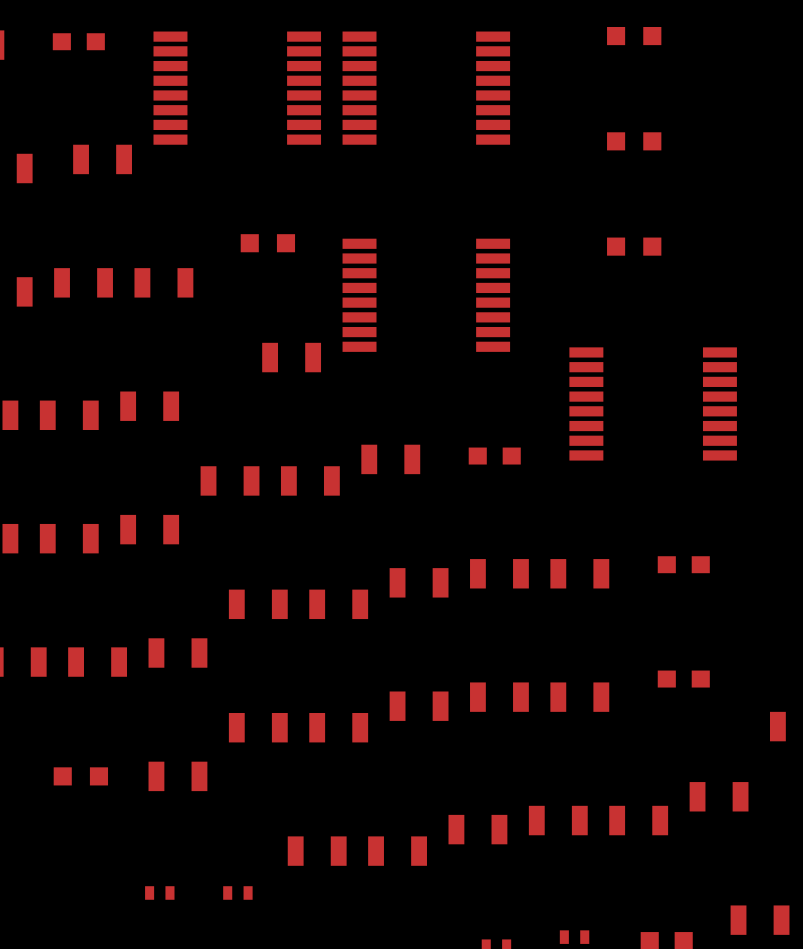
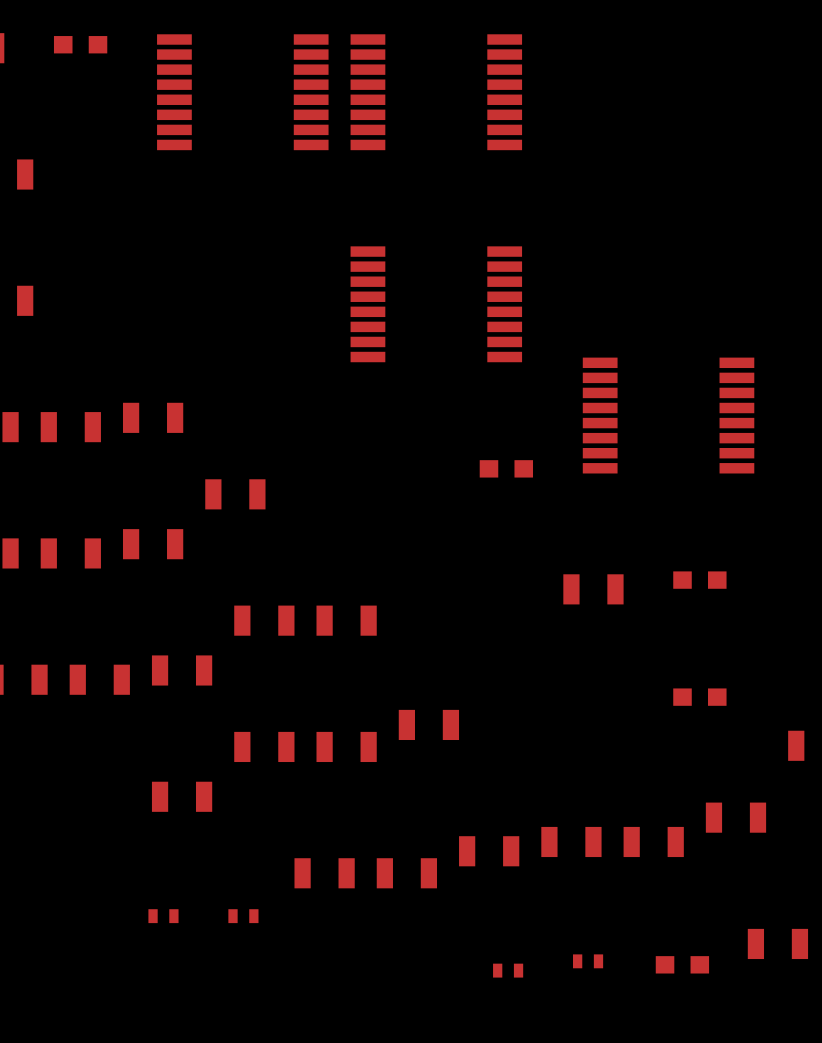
part: (634, 36) -> none
part: (634, 141) -> none
part: (102, 159) -> none
part: (267, 243) -> none
part: (634, 246) -> none
part: (83, 282) -> none
part: (163, 282) -> none
part: (291, 357) -> none
part: (390, 459) -> none
part: (310, 480) -> none
part: (499, 573) -> none
part: (419, 582) -> none
part: (499, 697) -> none
part: (579, 697) -> none
part: (80, 776) -> none

